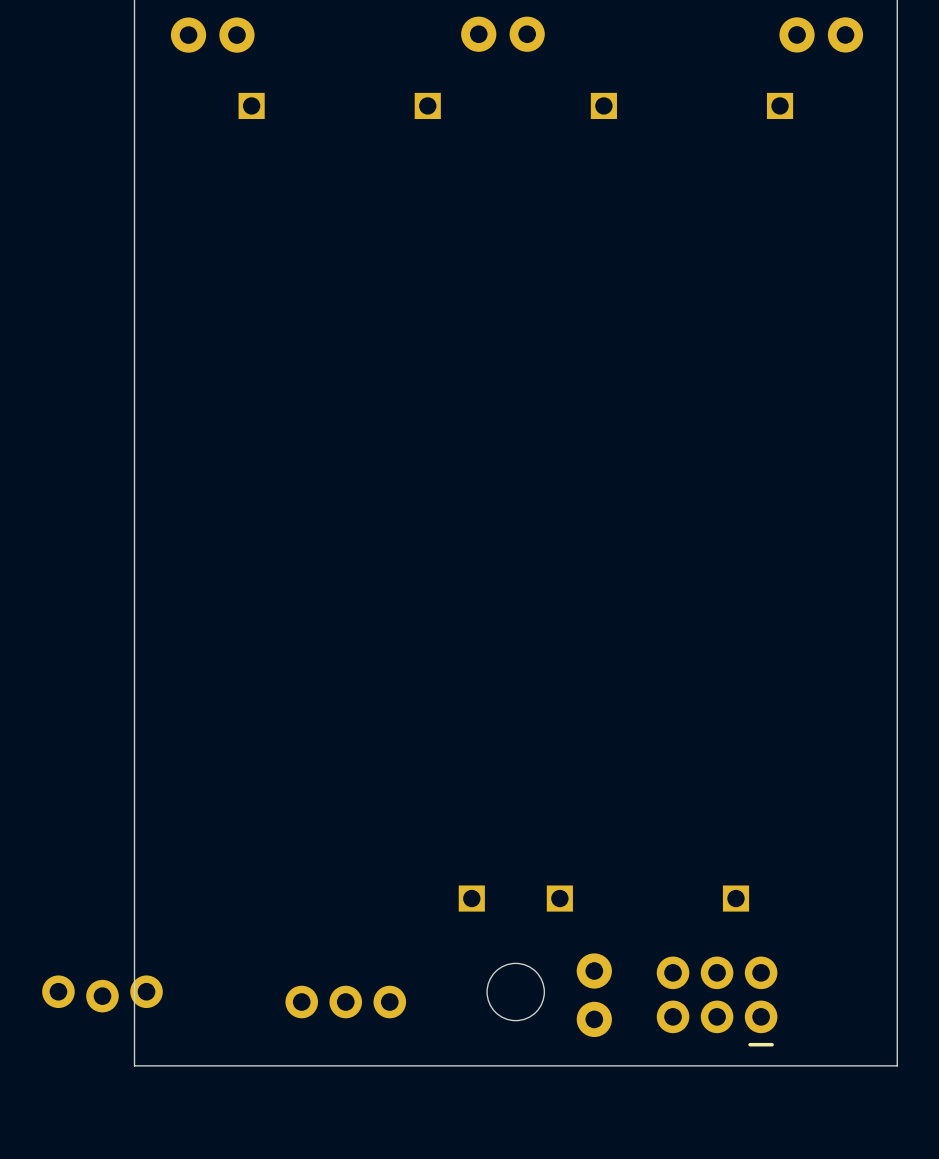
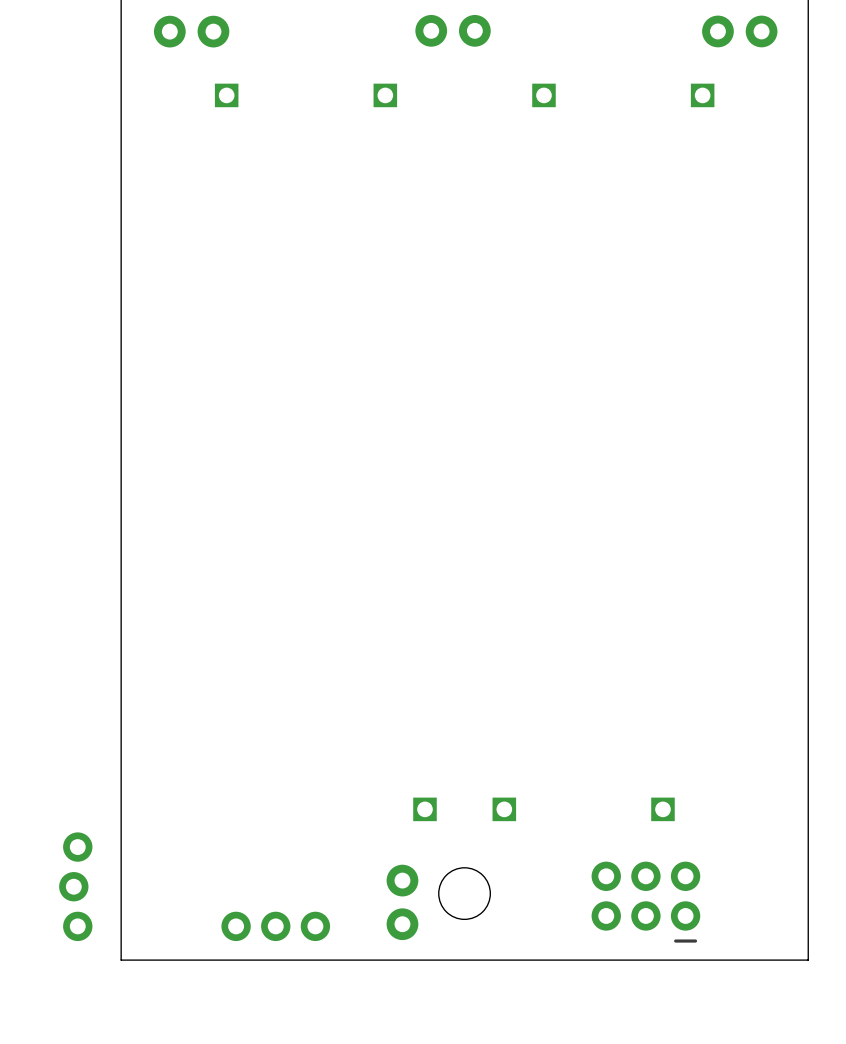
part rotation: 0° (102, 993) -> 90° clockwise (75, 886)
part position: (594, 995) -> (402, 902)
part position: (345, 1002) -> (275, 926)

